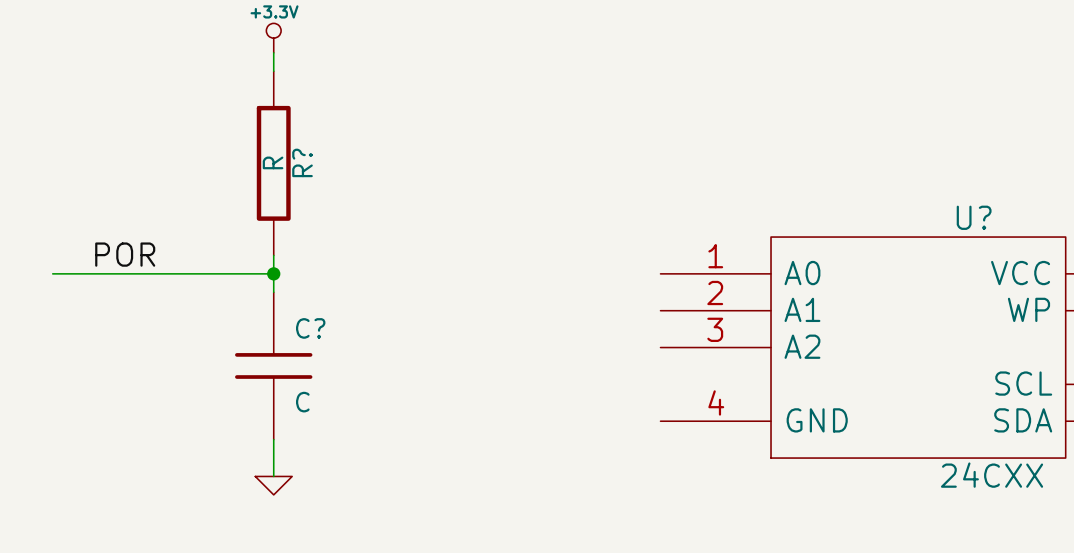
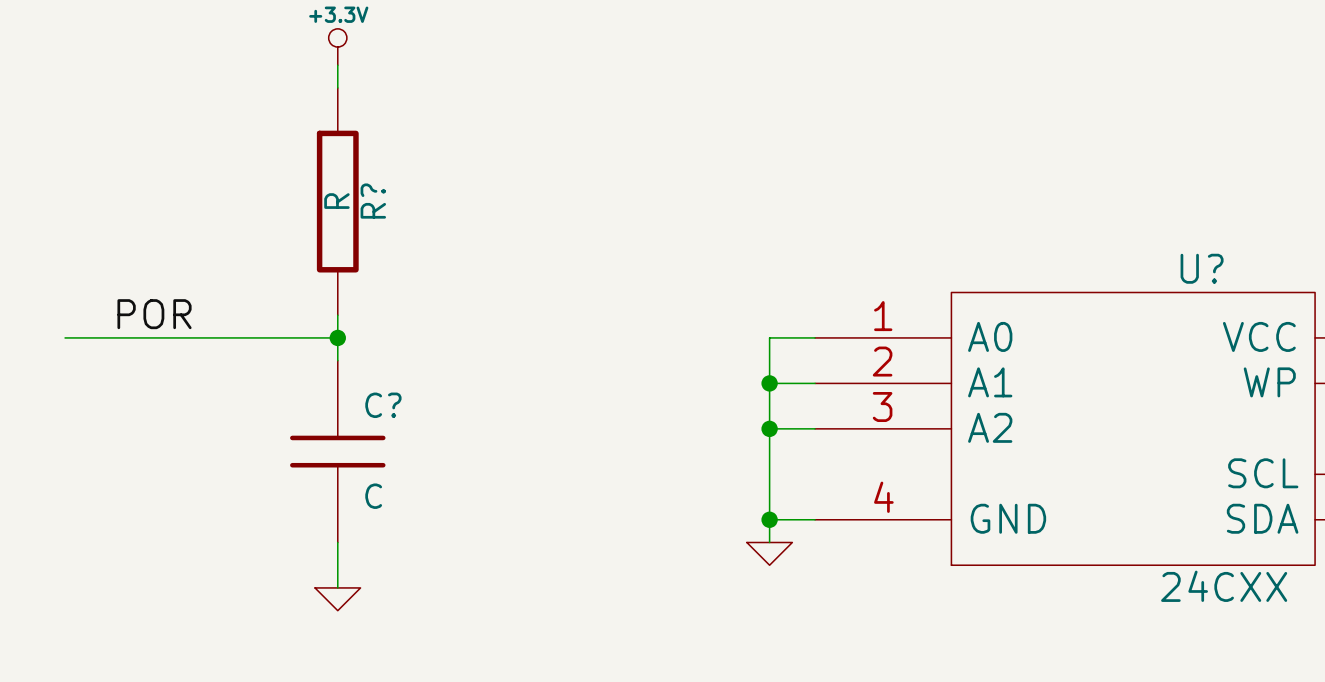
wire: none -> (815, 337) (769, 337) (769, 542)
wire: none -> (769, 383) (815, 383)
junction: none -> (769, 383)
wire: none -> (769, 428) (815, 428)
junction: none -> (769, 428)
wire: none -> (769, 519) (815, 519)
junction: none -> (769, 519)
power symbol: none -> (769, 553)

